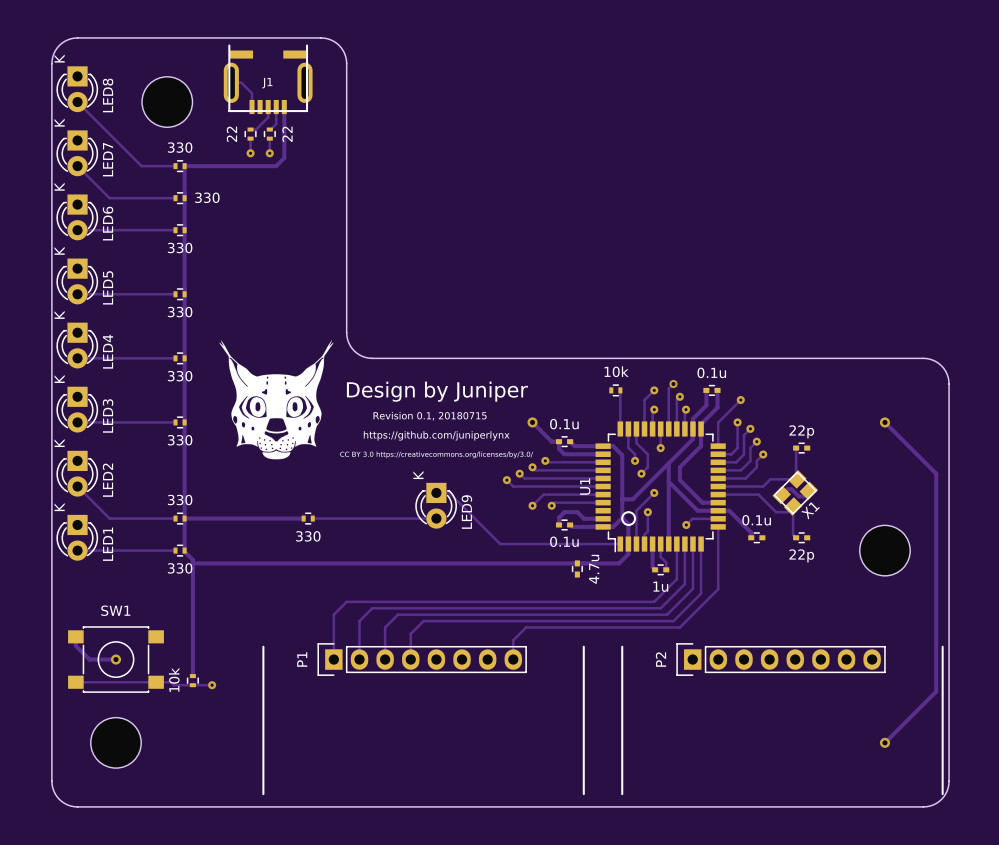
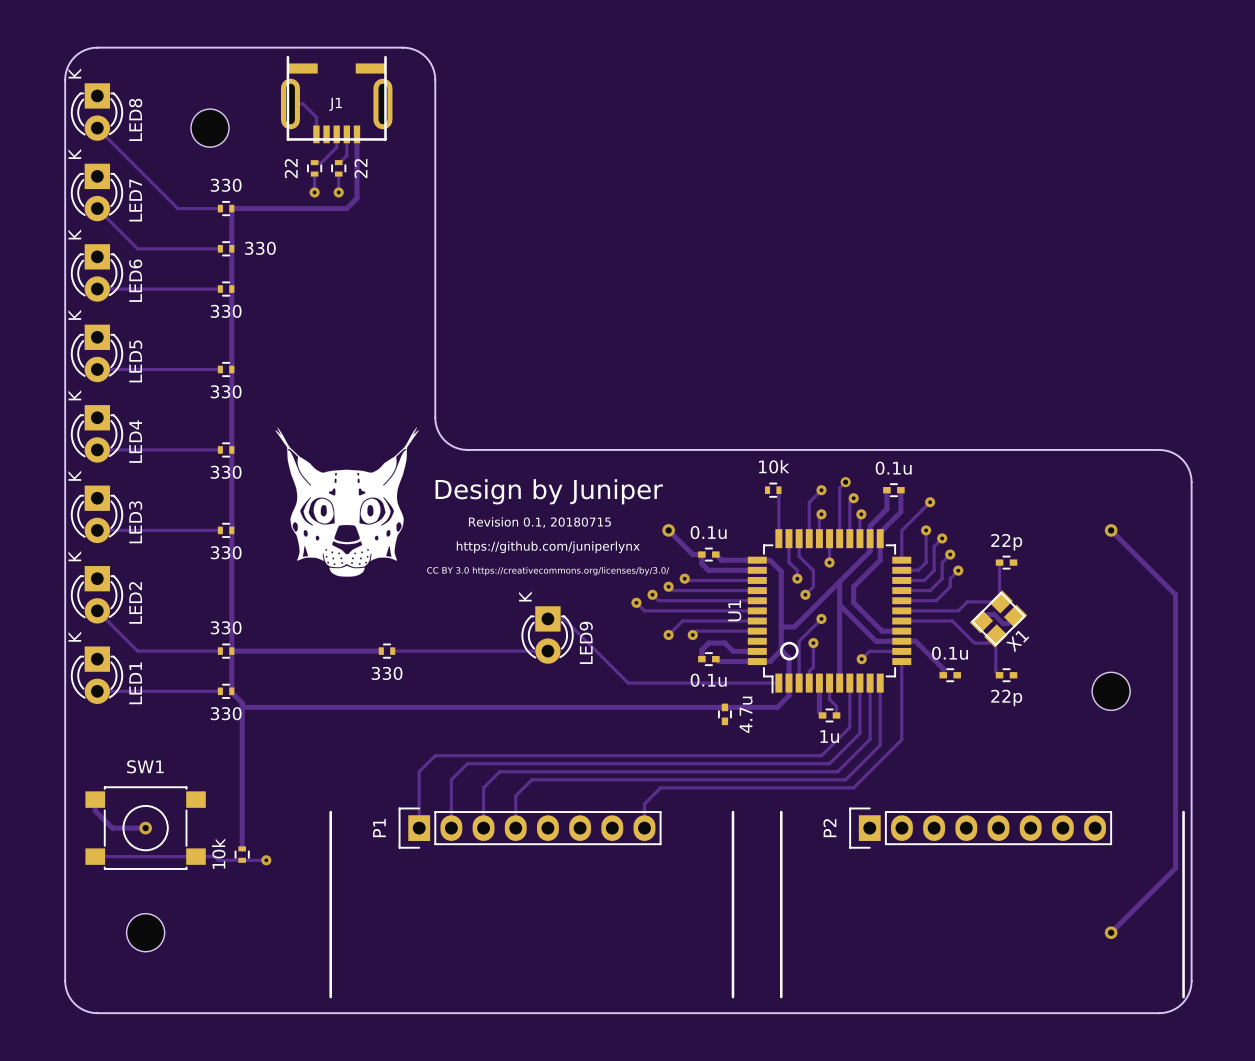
part footprint: [142, 76, 193, 128] -> [191, 109, 230, 148]
part footprint: [859, 525, 911, 576] -> [1092, 672, 1131, 711]
part footprint: [90, 717, 142, 769] -> [126, 913, 165, 952]

